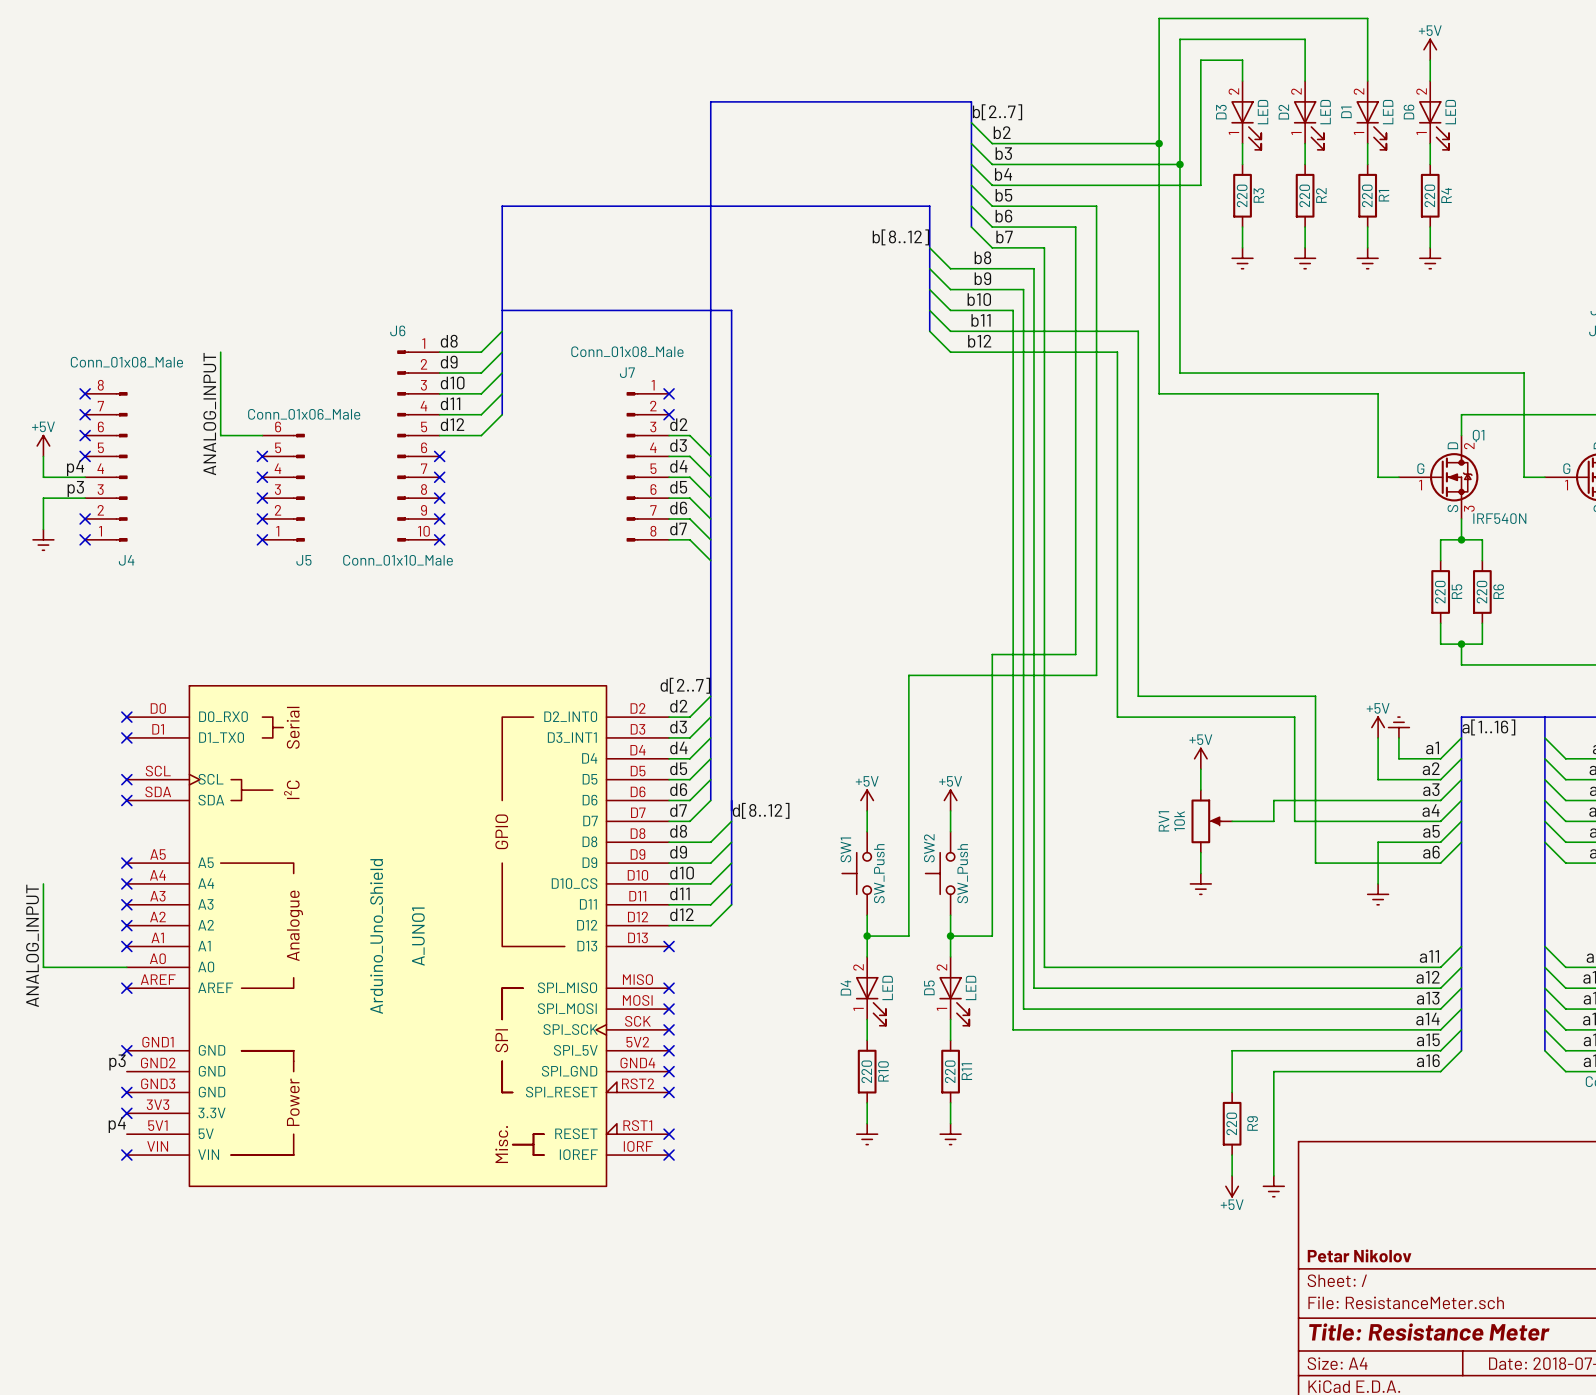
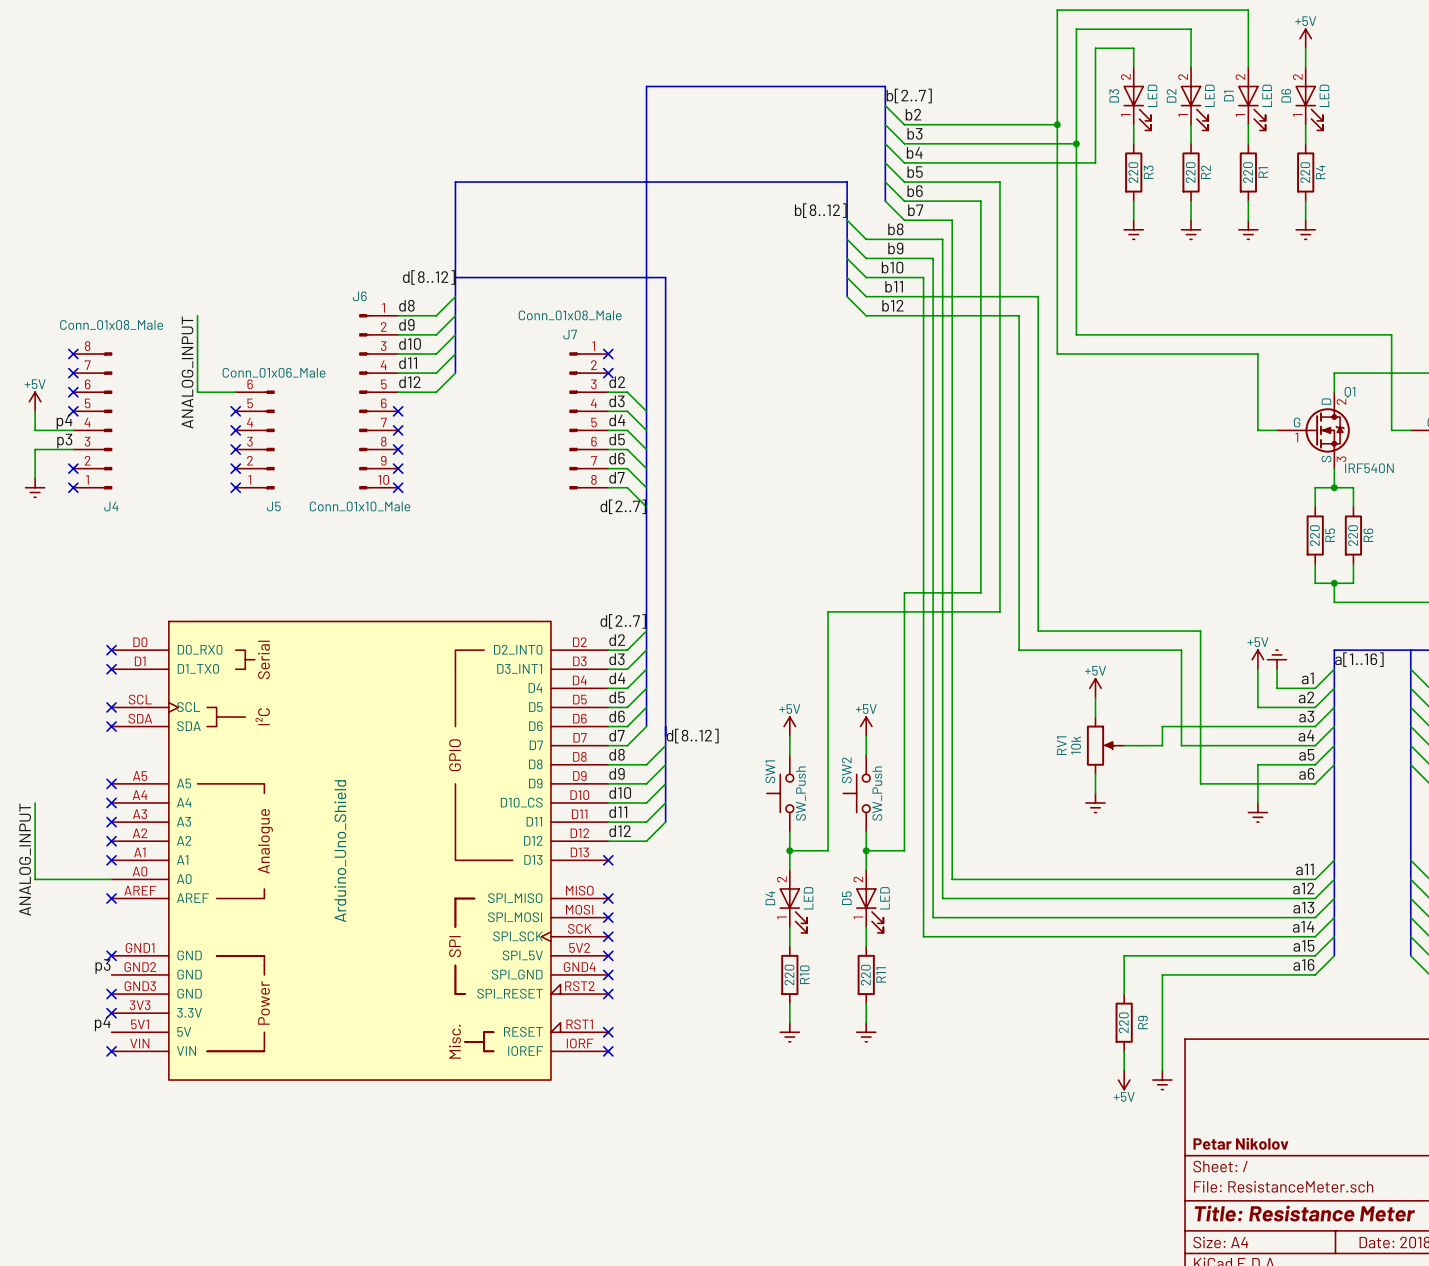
label: none -> d[8..12] (428, 277)
label: none -> d[2..7] (623, 506)
A_UNO1 name: A_UNO1 (418, 936) -> none

